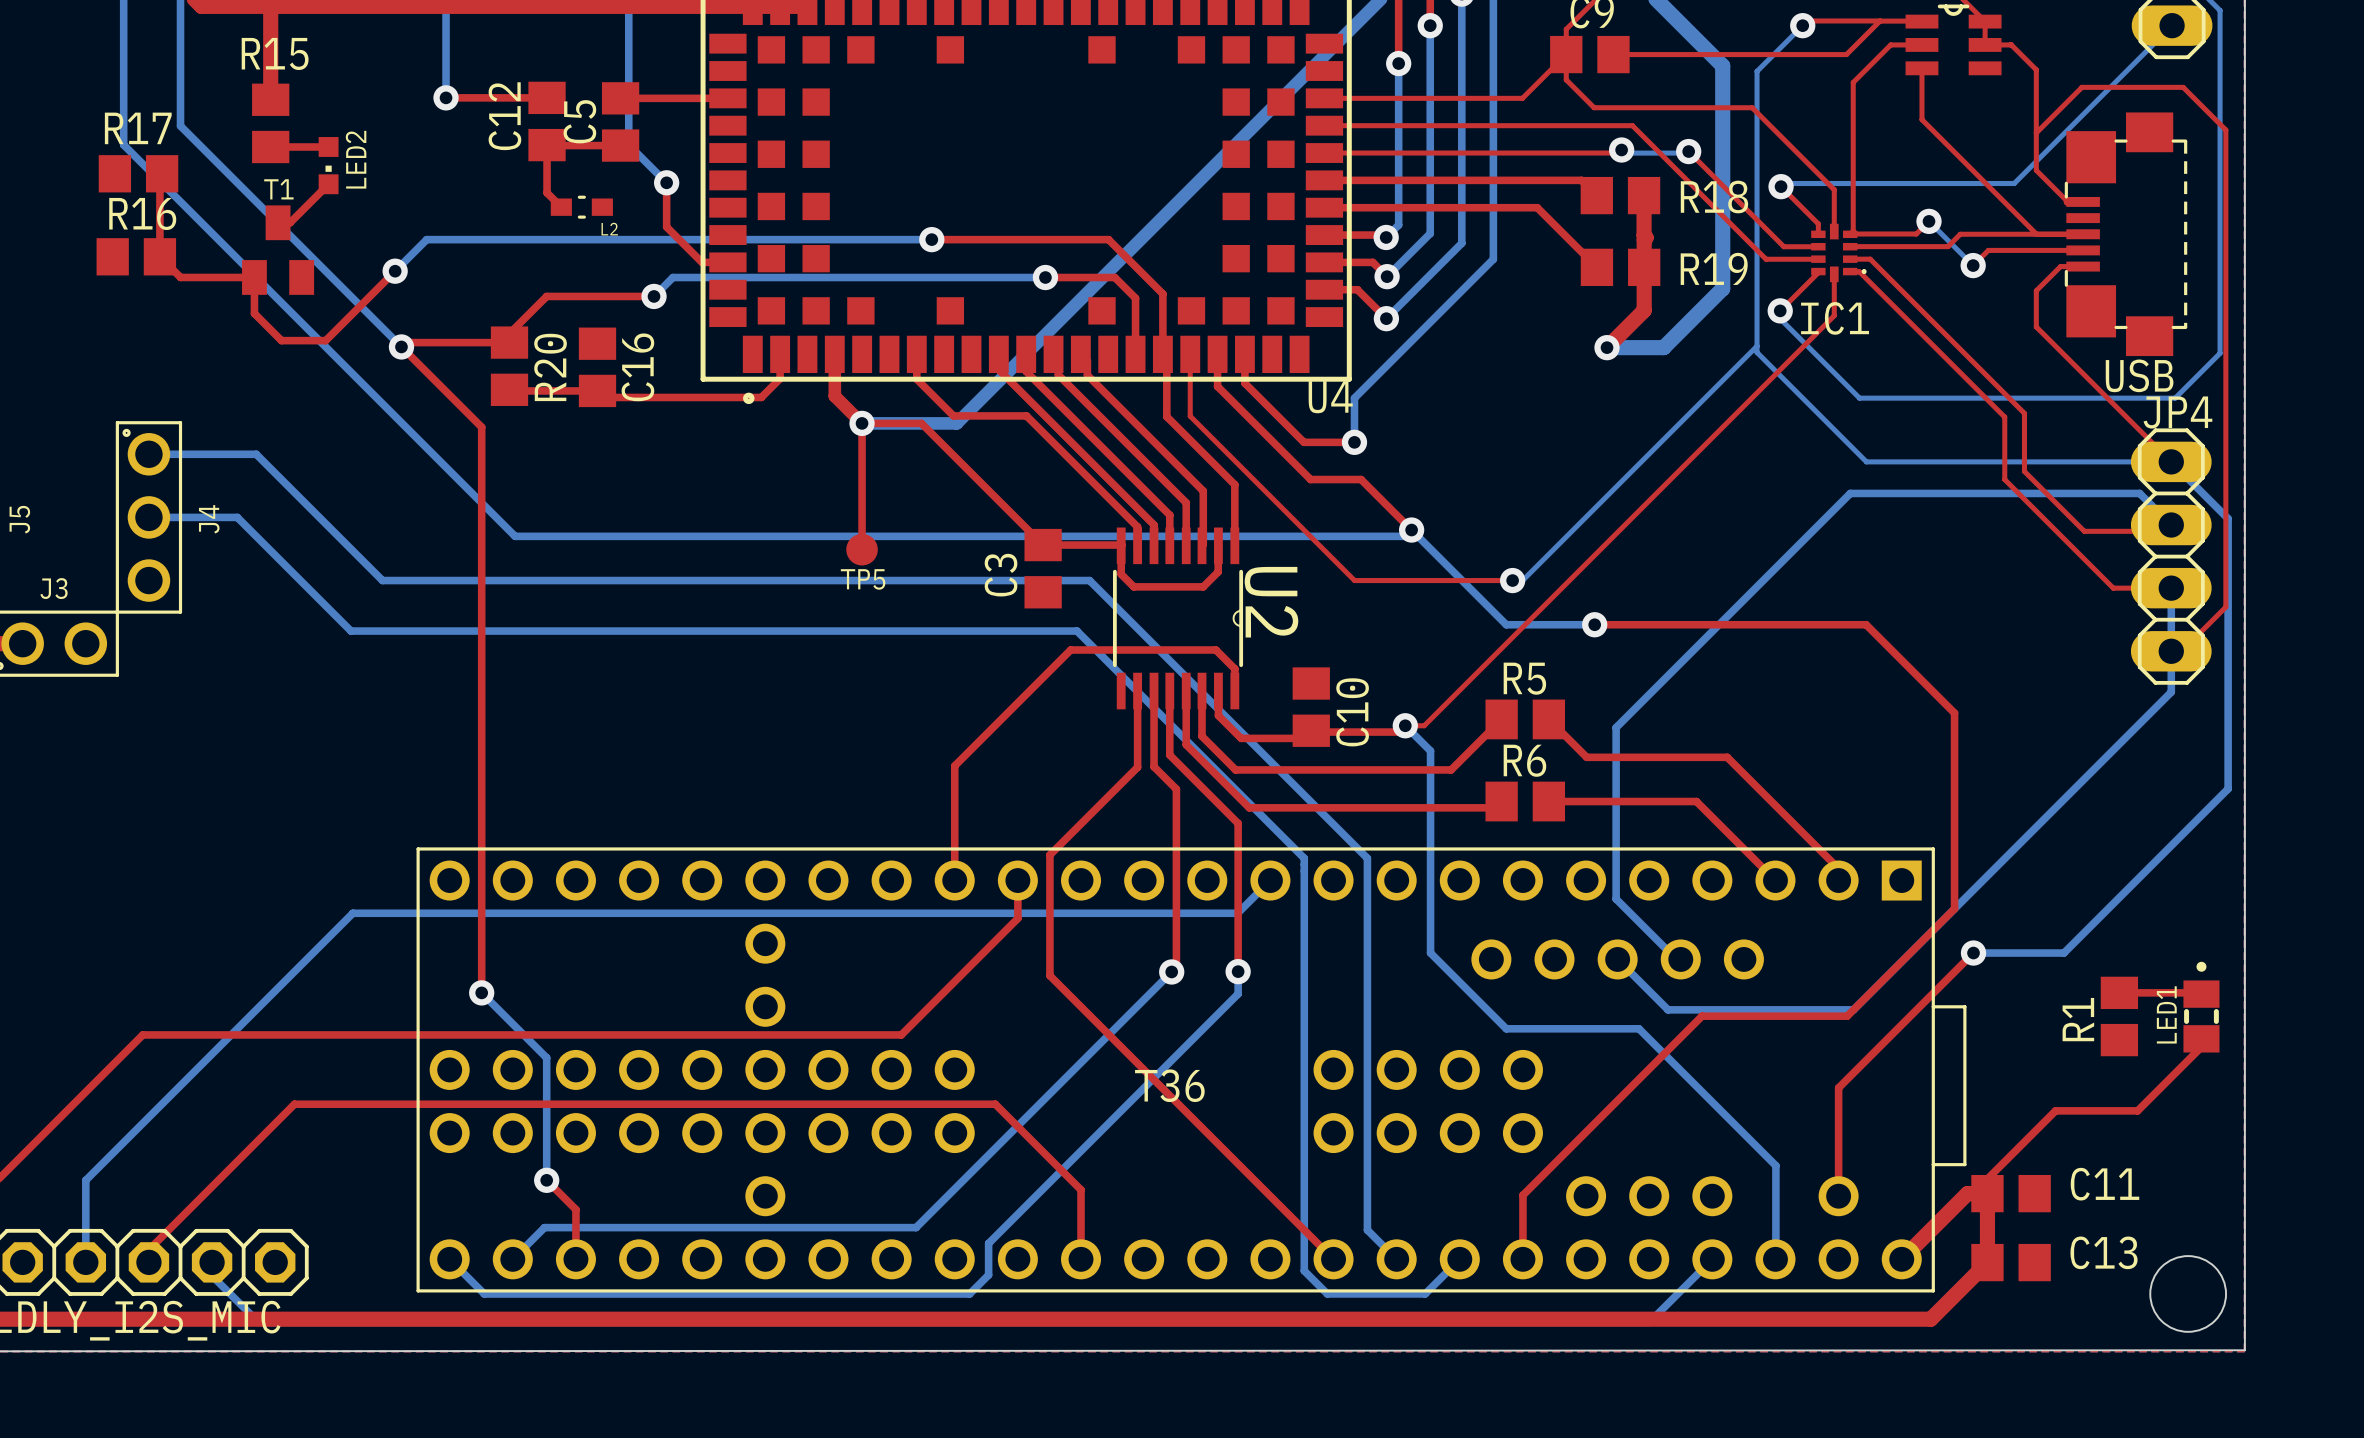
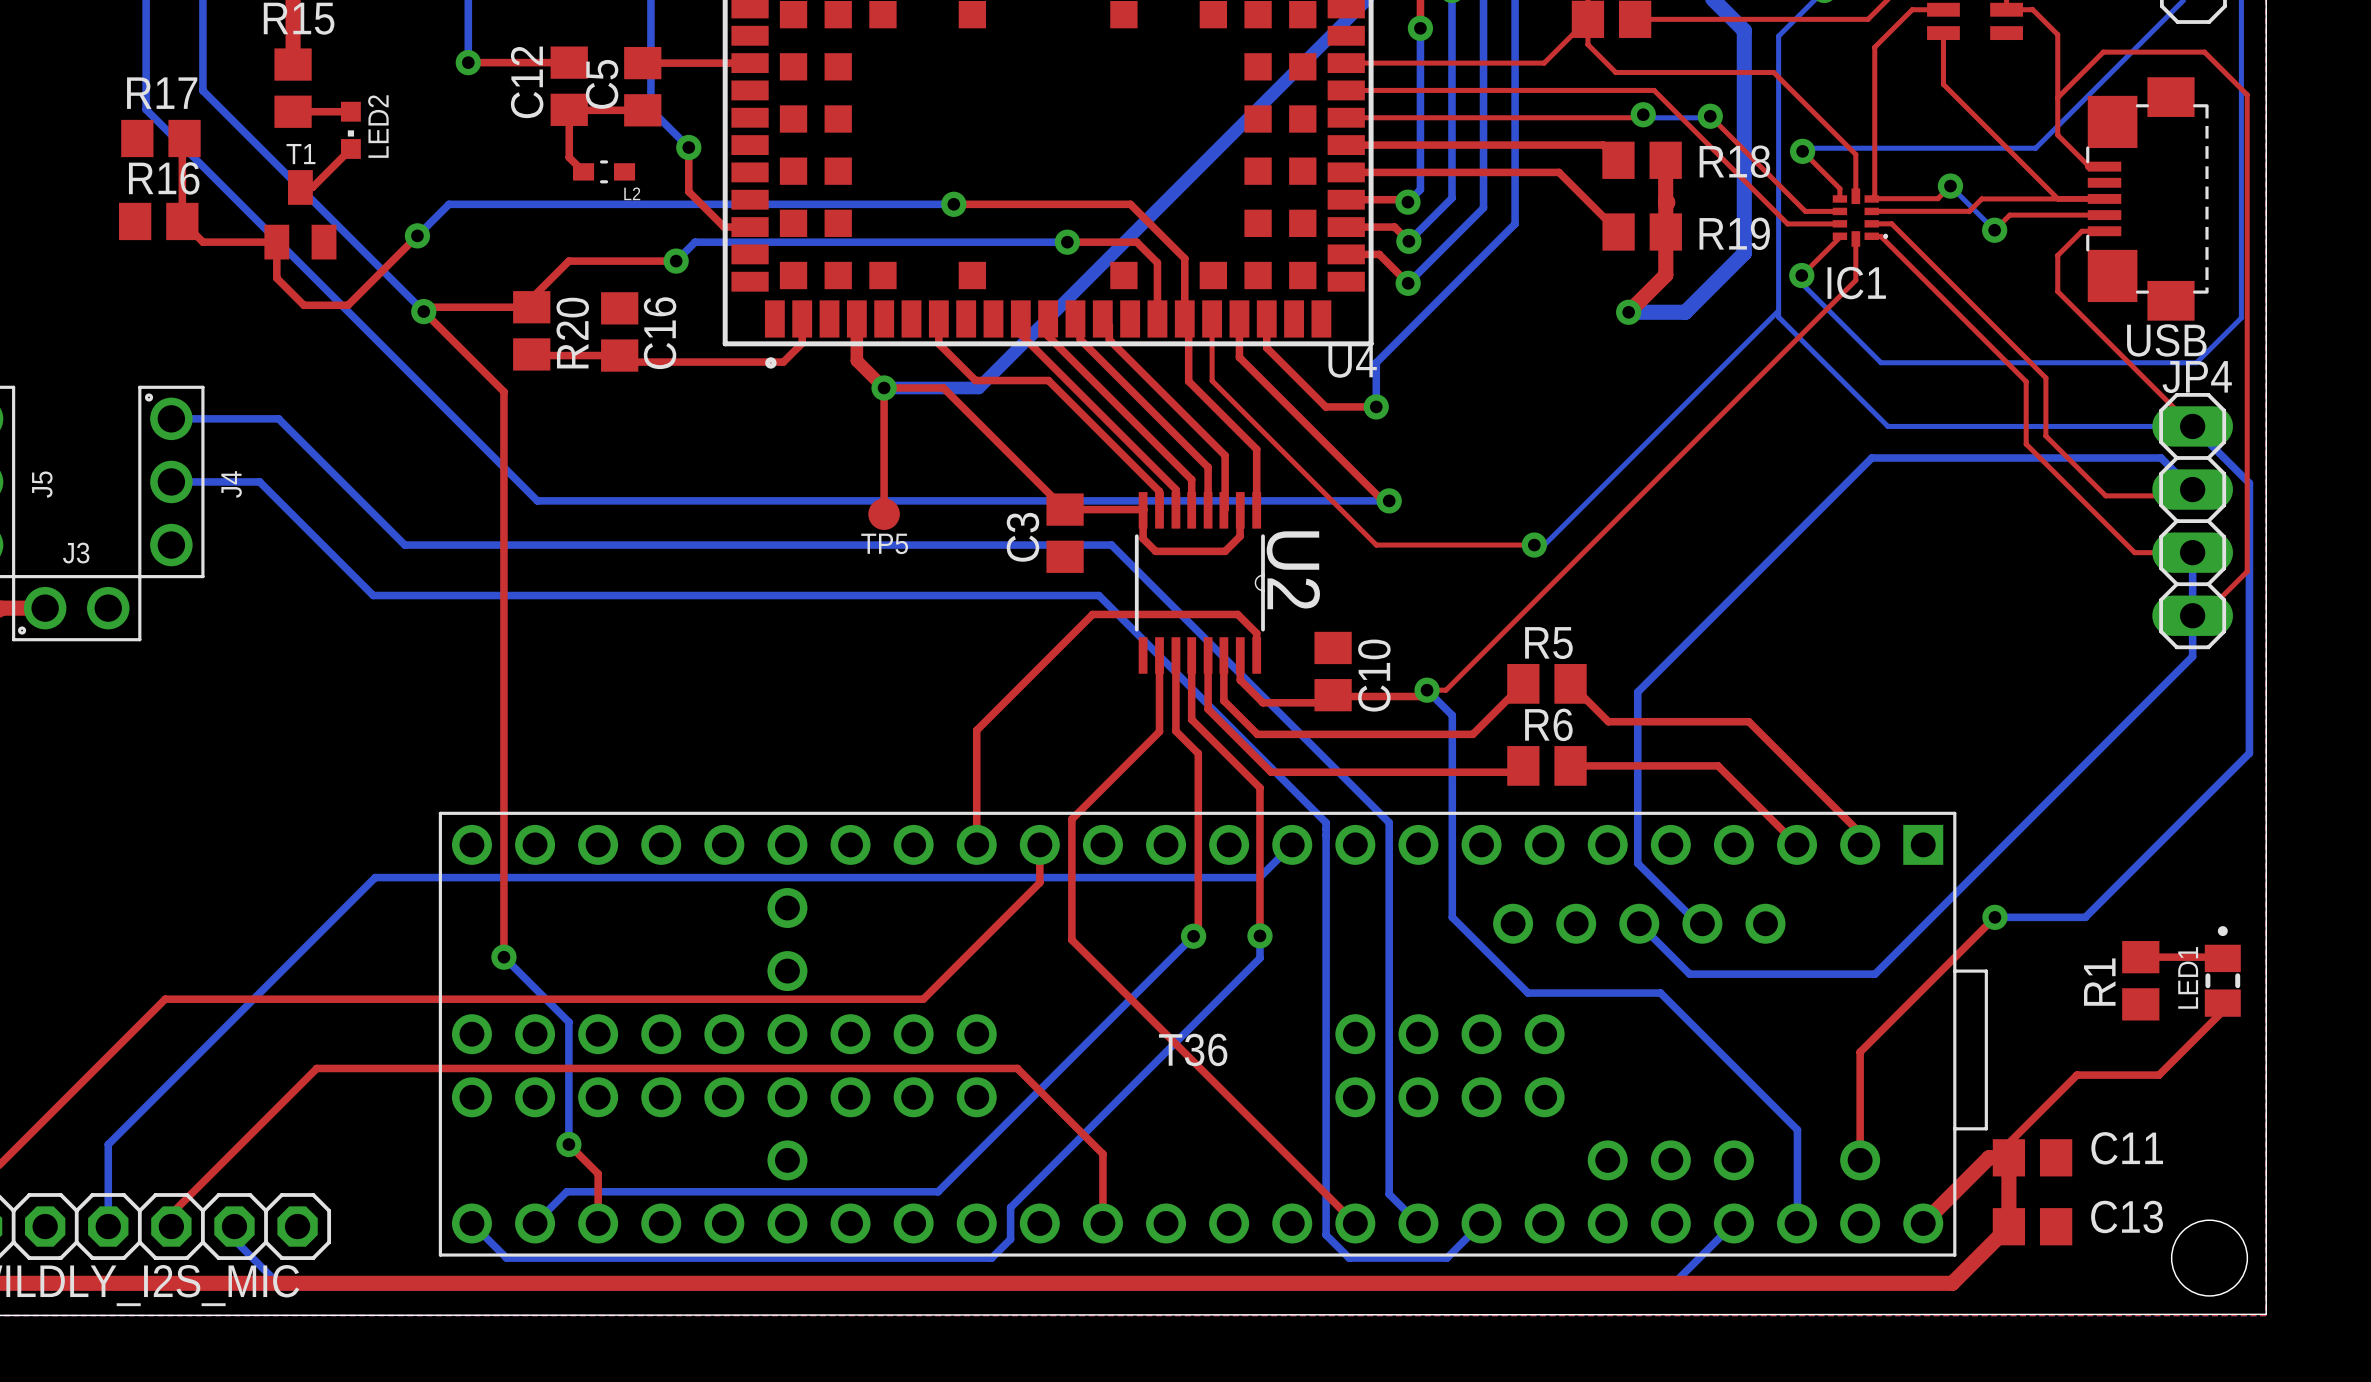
top track: (1217, 386) (1310, 479) (1361, 479) (1411, 530) -> (1239, 351) (1239, 357) (1382, 500) (1389, 500)
via position: (1411, 530) -> (1389, 500)
bottom track: (1367, 536) (1405, 536) (1411, 530) (1506, 624) (1594, 624) -> none
top track: (1594, 624) (1866, 624) (1954, 713) (1954, 908) (1847, 1016) (1702, 1016) (1522, 1195) (1522, 1259) -> none
via: (1594, 624) -> none

